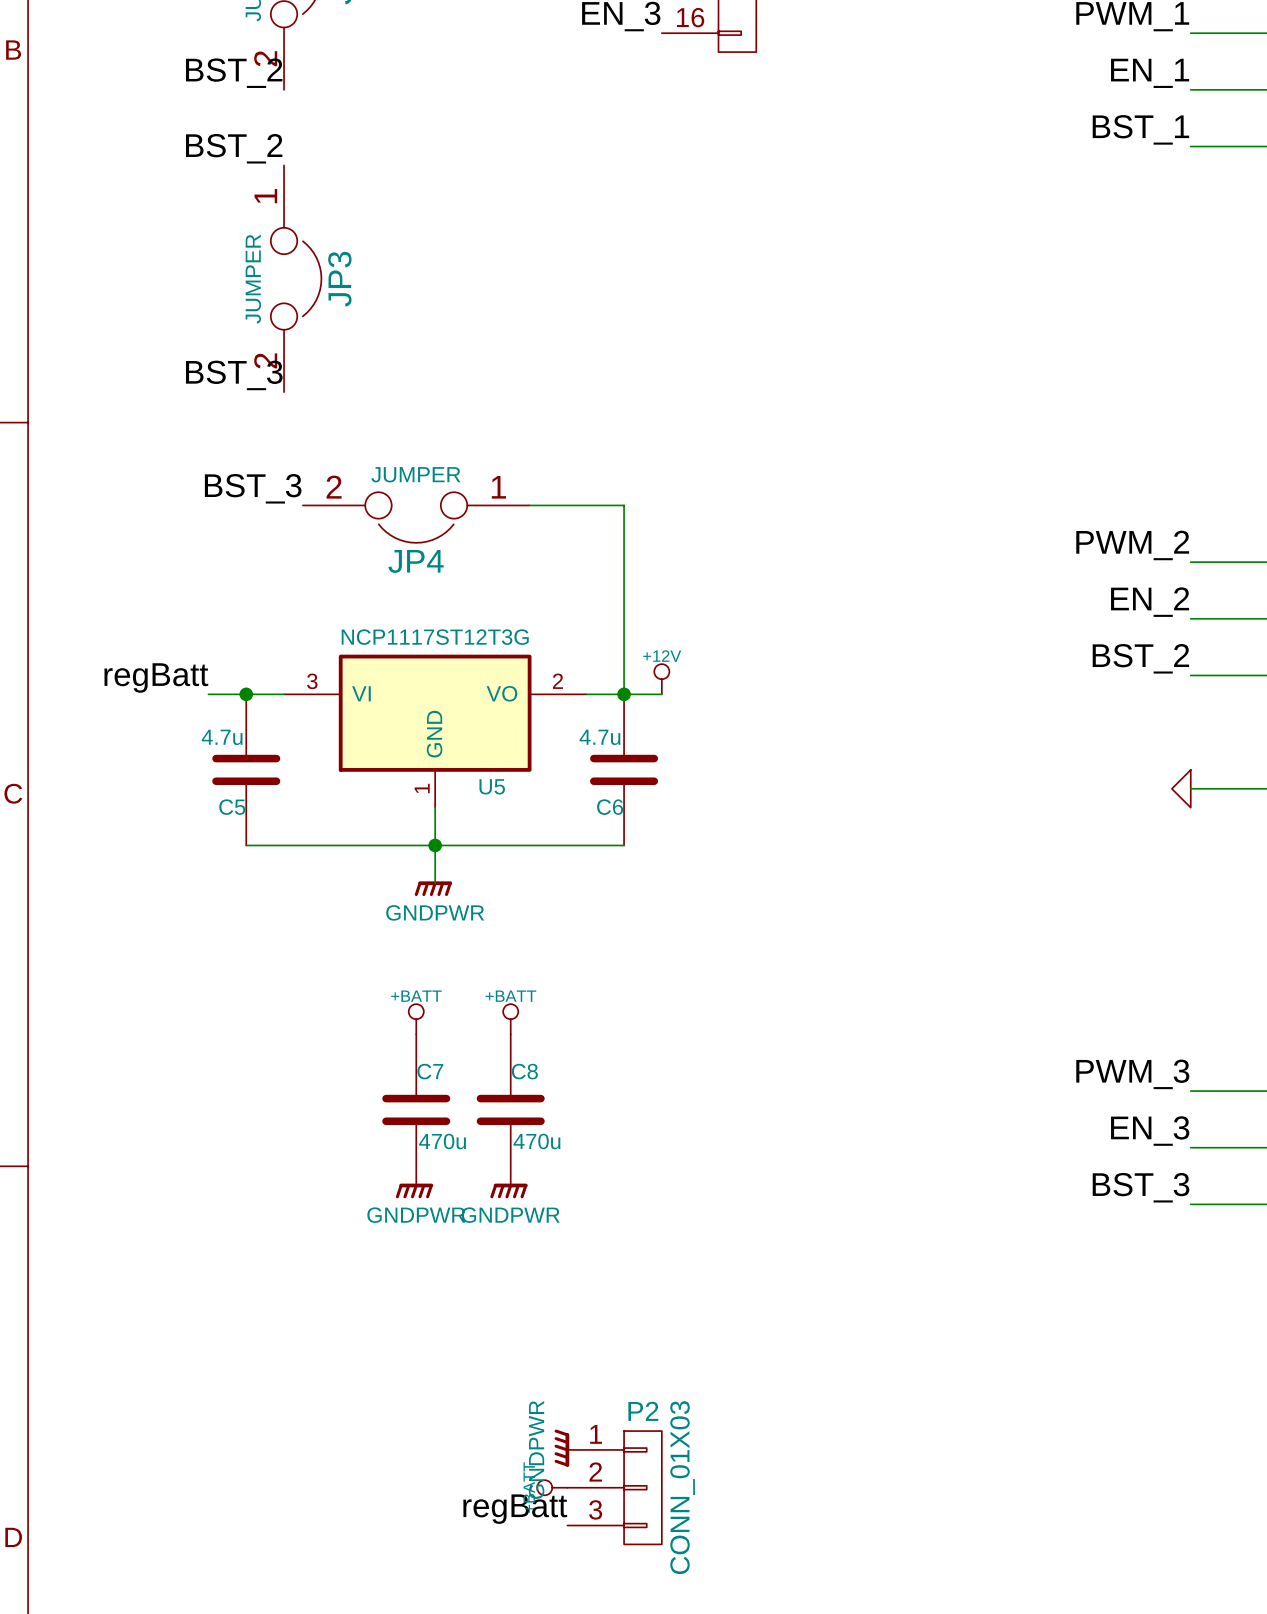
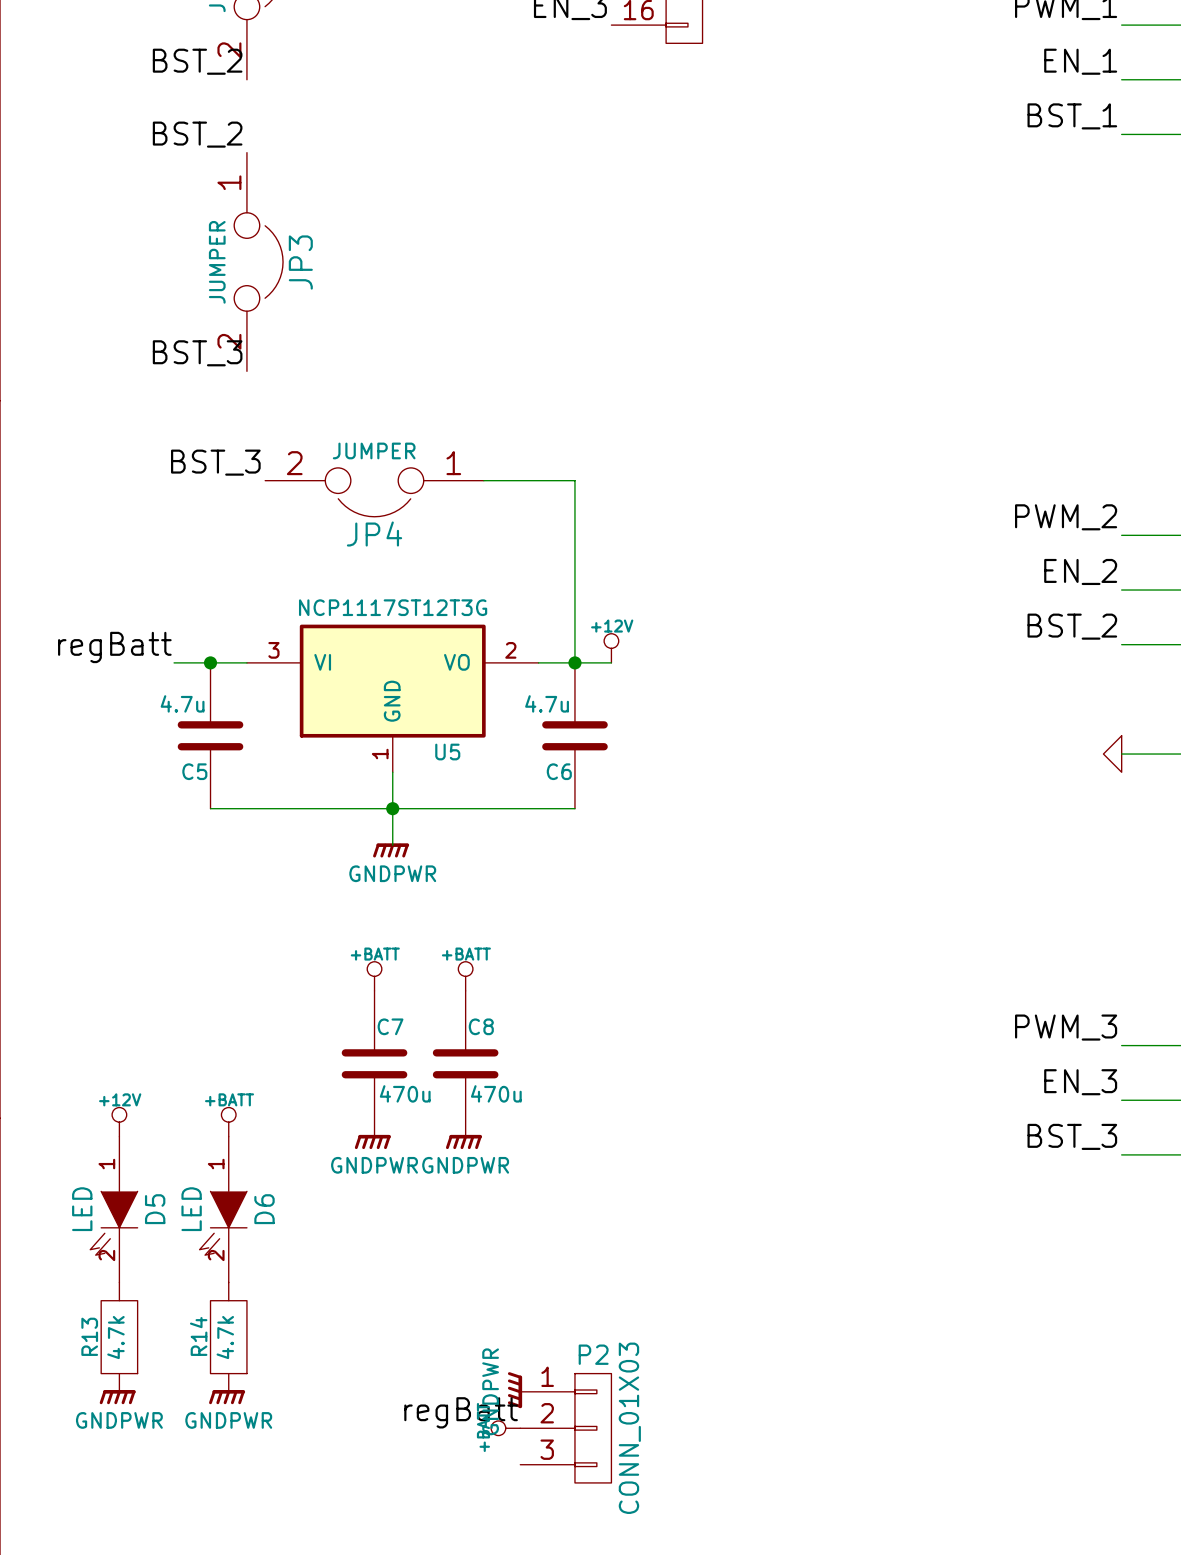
power symbol: none -> +12V (119, 1122)
power symbol: none -> +BATT (228, 1122)
D5: none -> LED (113, 1209)
D6: none -> LED (223, 1209)
R13: none -> 4.7k (119, 1337)
R14: none -> 4.7k (228, 1337)
power symbol: none -> GNDPWR (117, 1397)
power symbol: none -> GNDPWR (227, 1397)
label position: regBatt (515, 1509) -> regBatt (461, 1412)

